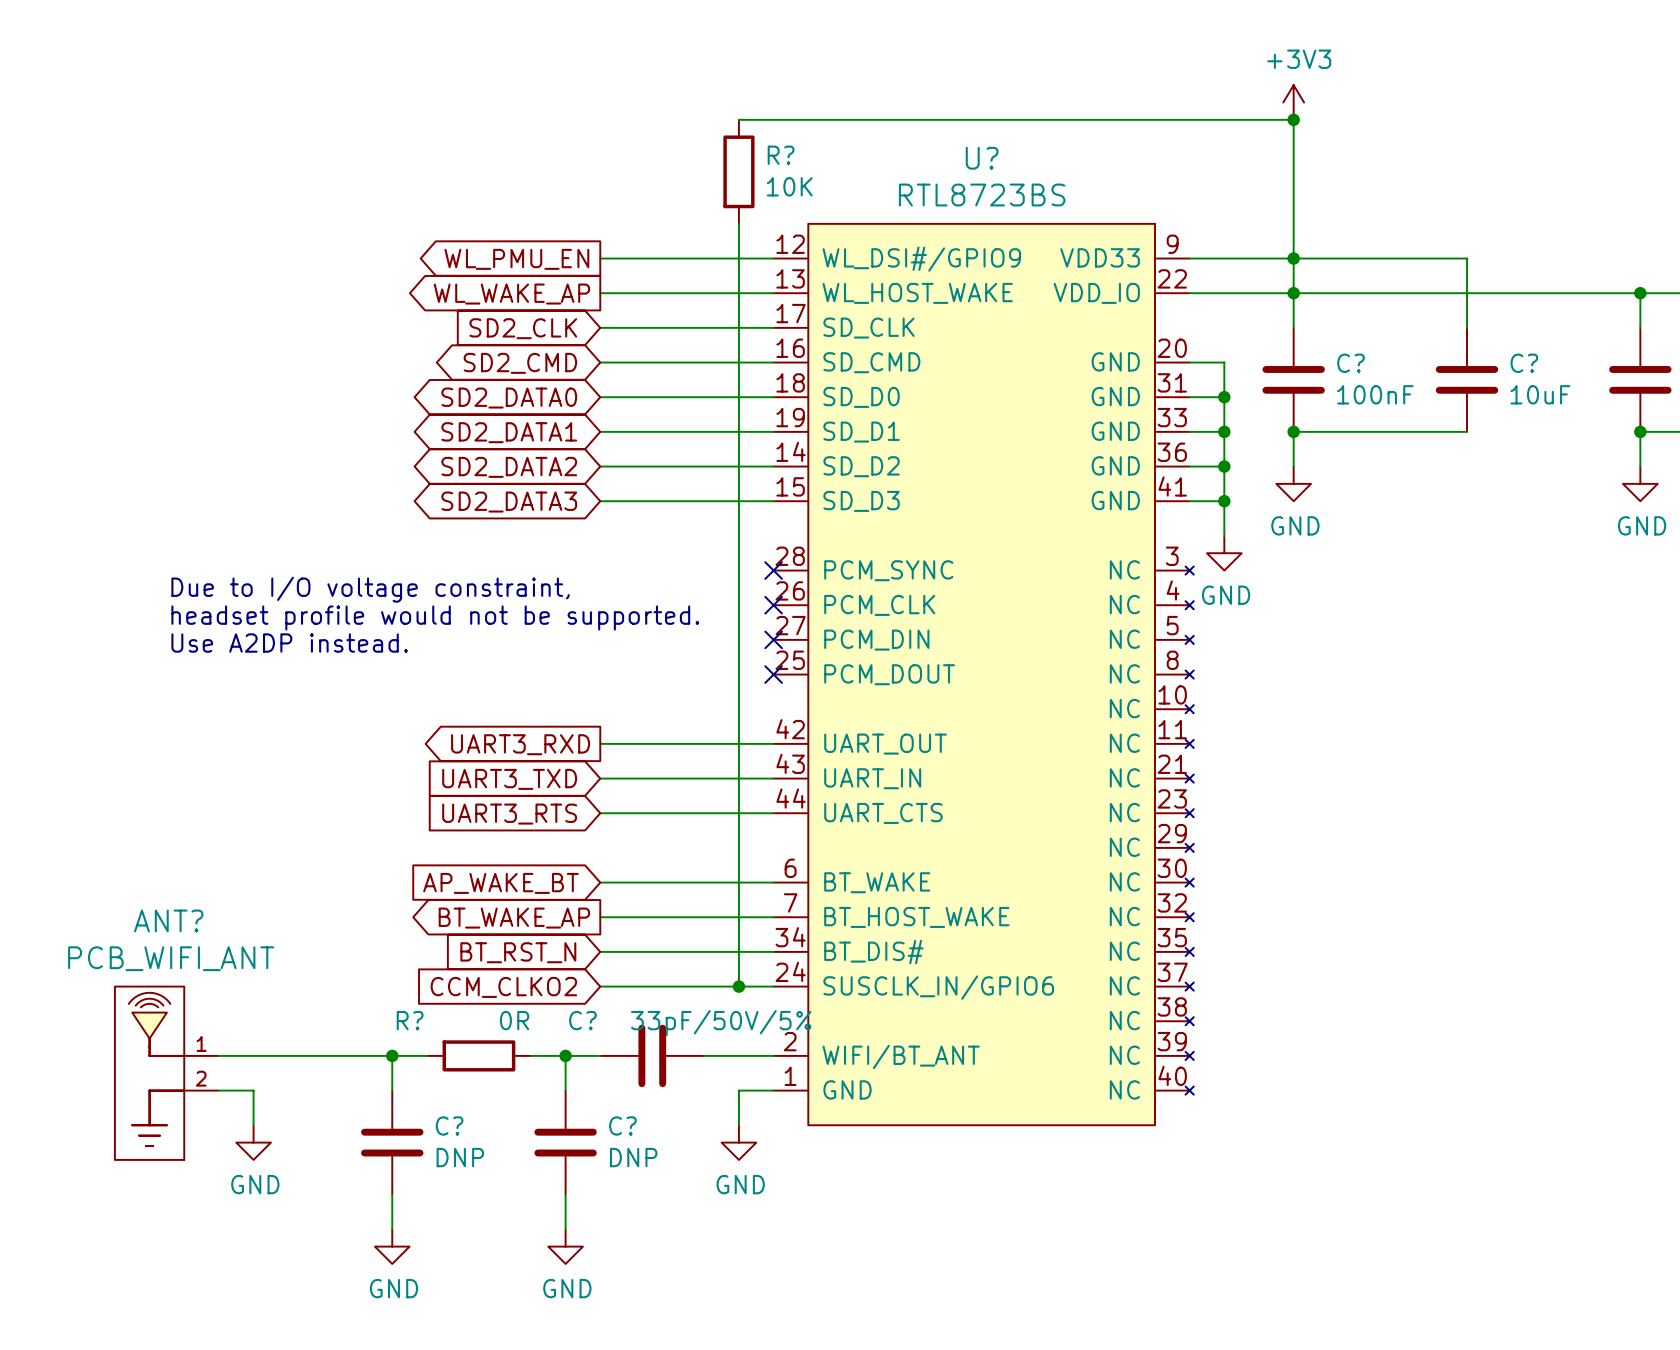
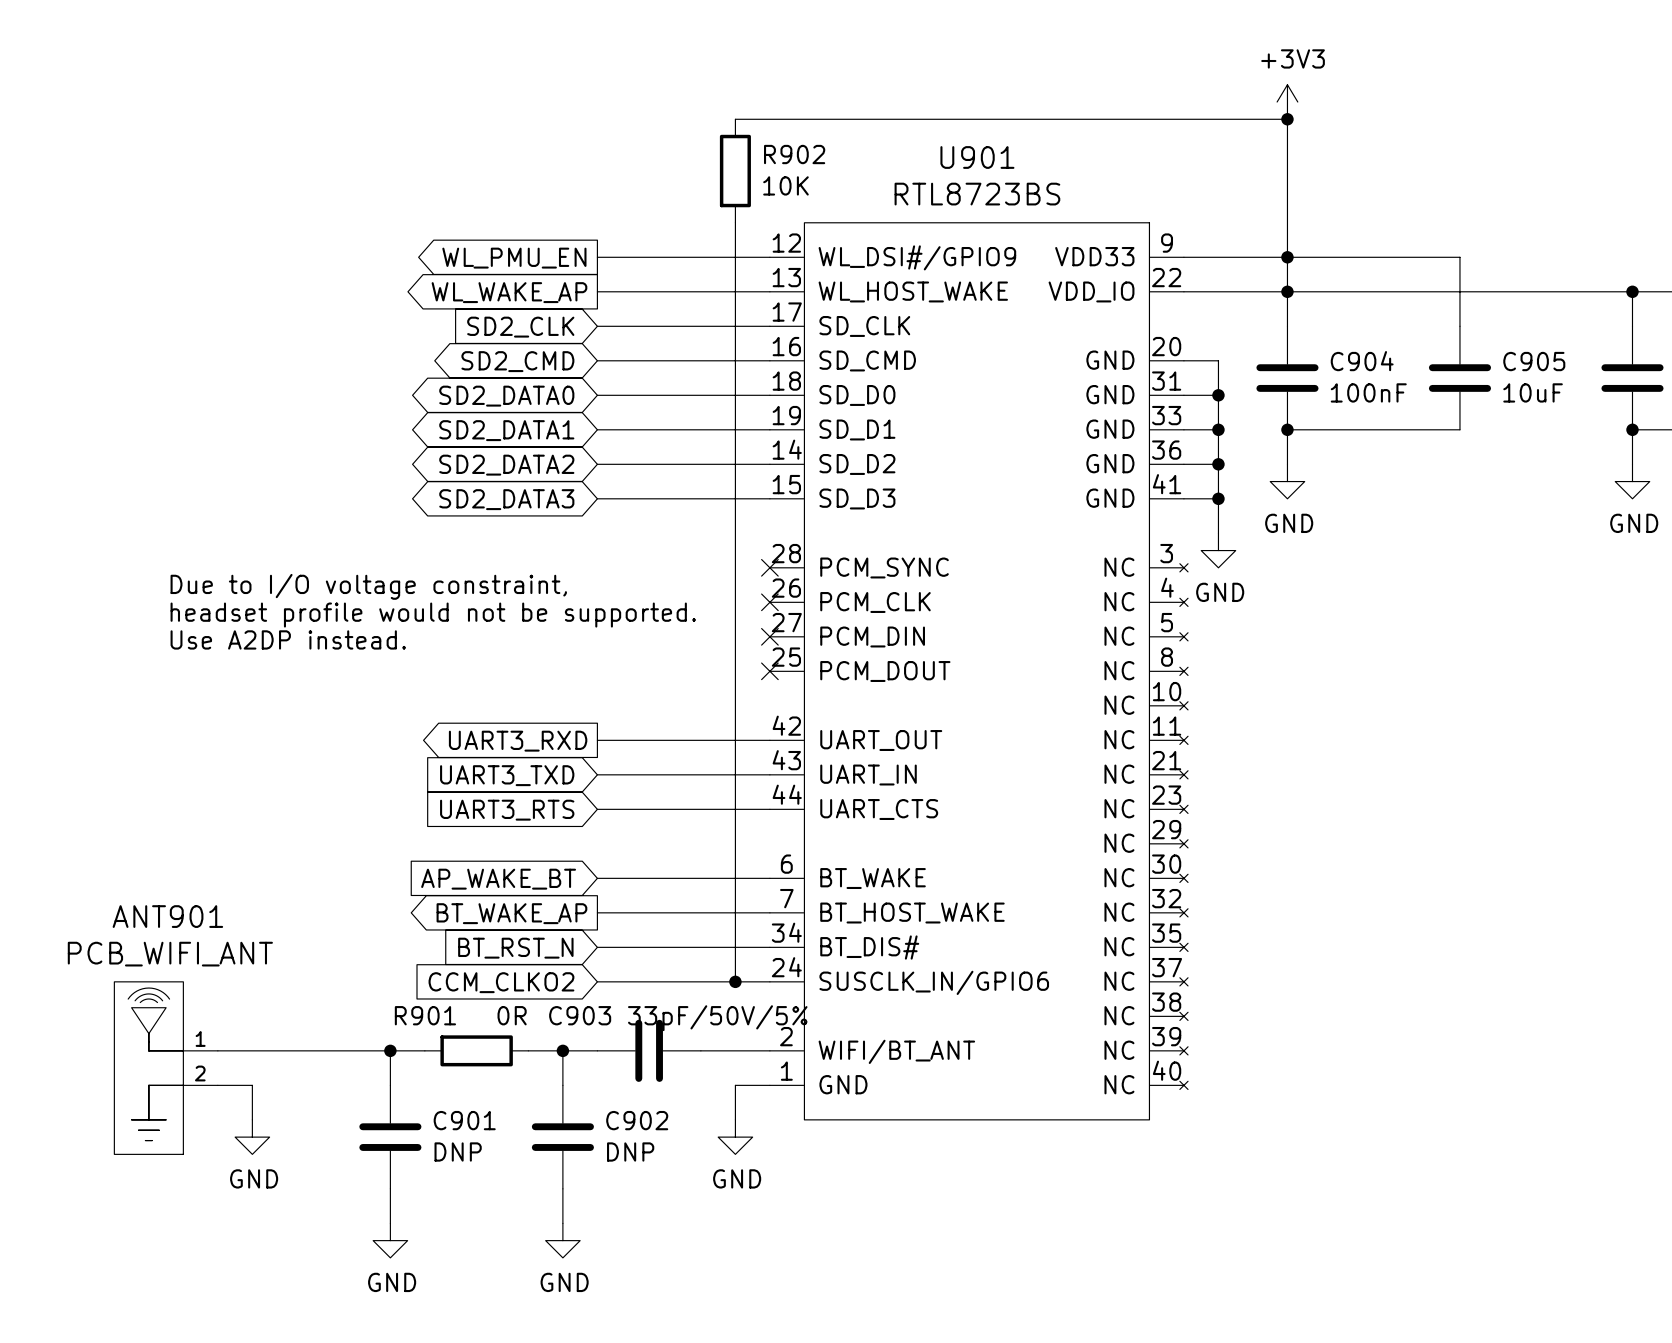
R? name: R? (781, 155) -> R902 (794, 154)
U? name: U? (982, 158) -> U901 (977, 157)
C? name: C? (1351, 363) -> C904 (1362, 361)
C? name: C? (1524, 363) -> C905 (1534, 361)
ANT? name: ANT? (168, 920) -> ANT901 (167, 916)
R? name: R? (410, 1020) -> R901 (425, 1015)
C? name: C? (582, 1020) -> C903 (580, 1015)
C? name: C? (449, 1126) -> C901 (464, 1120)
C? name: C? (622, 1126) -> C902 (637, 1120)

